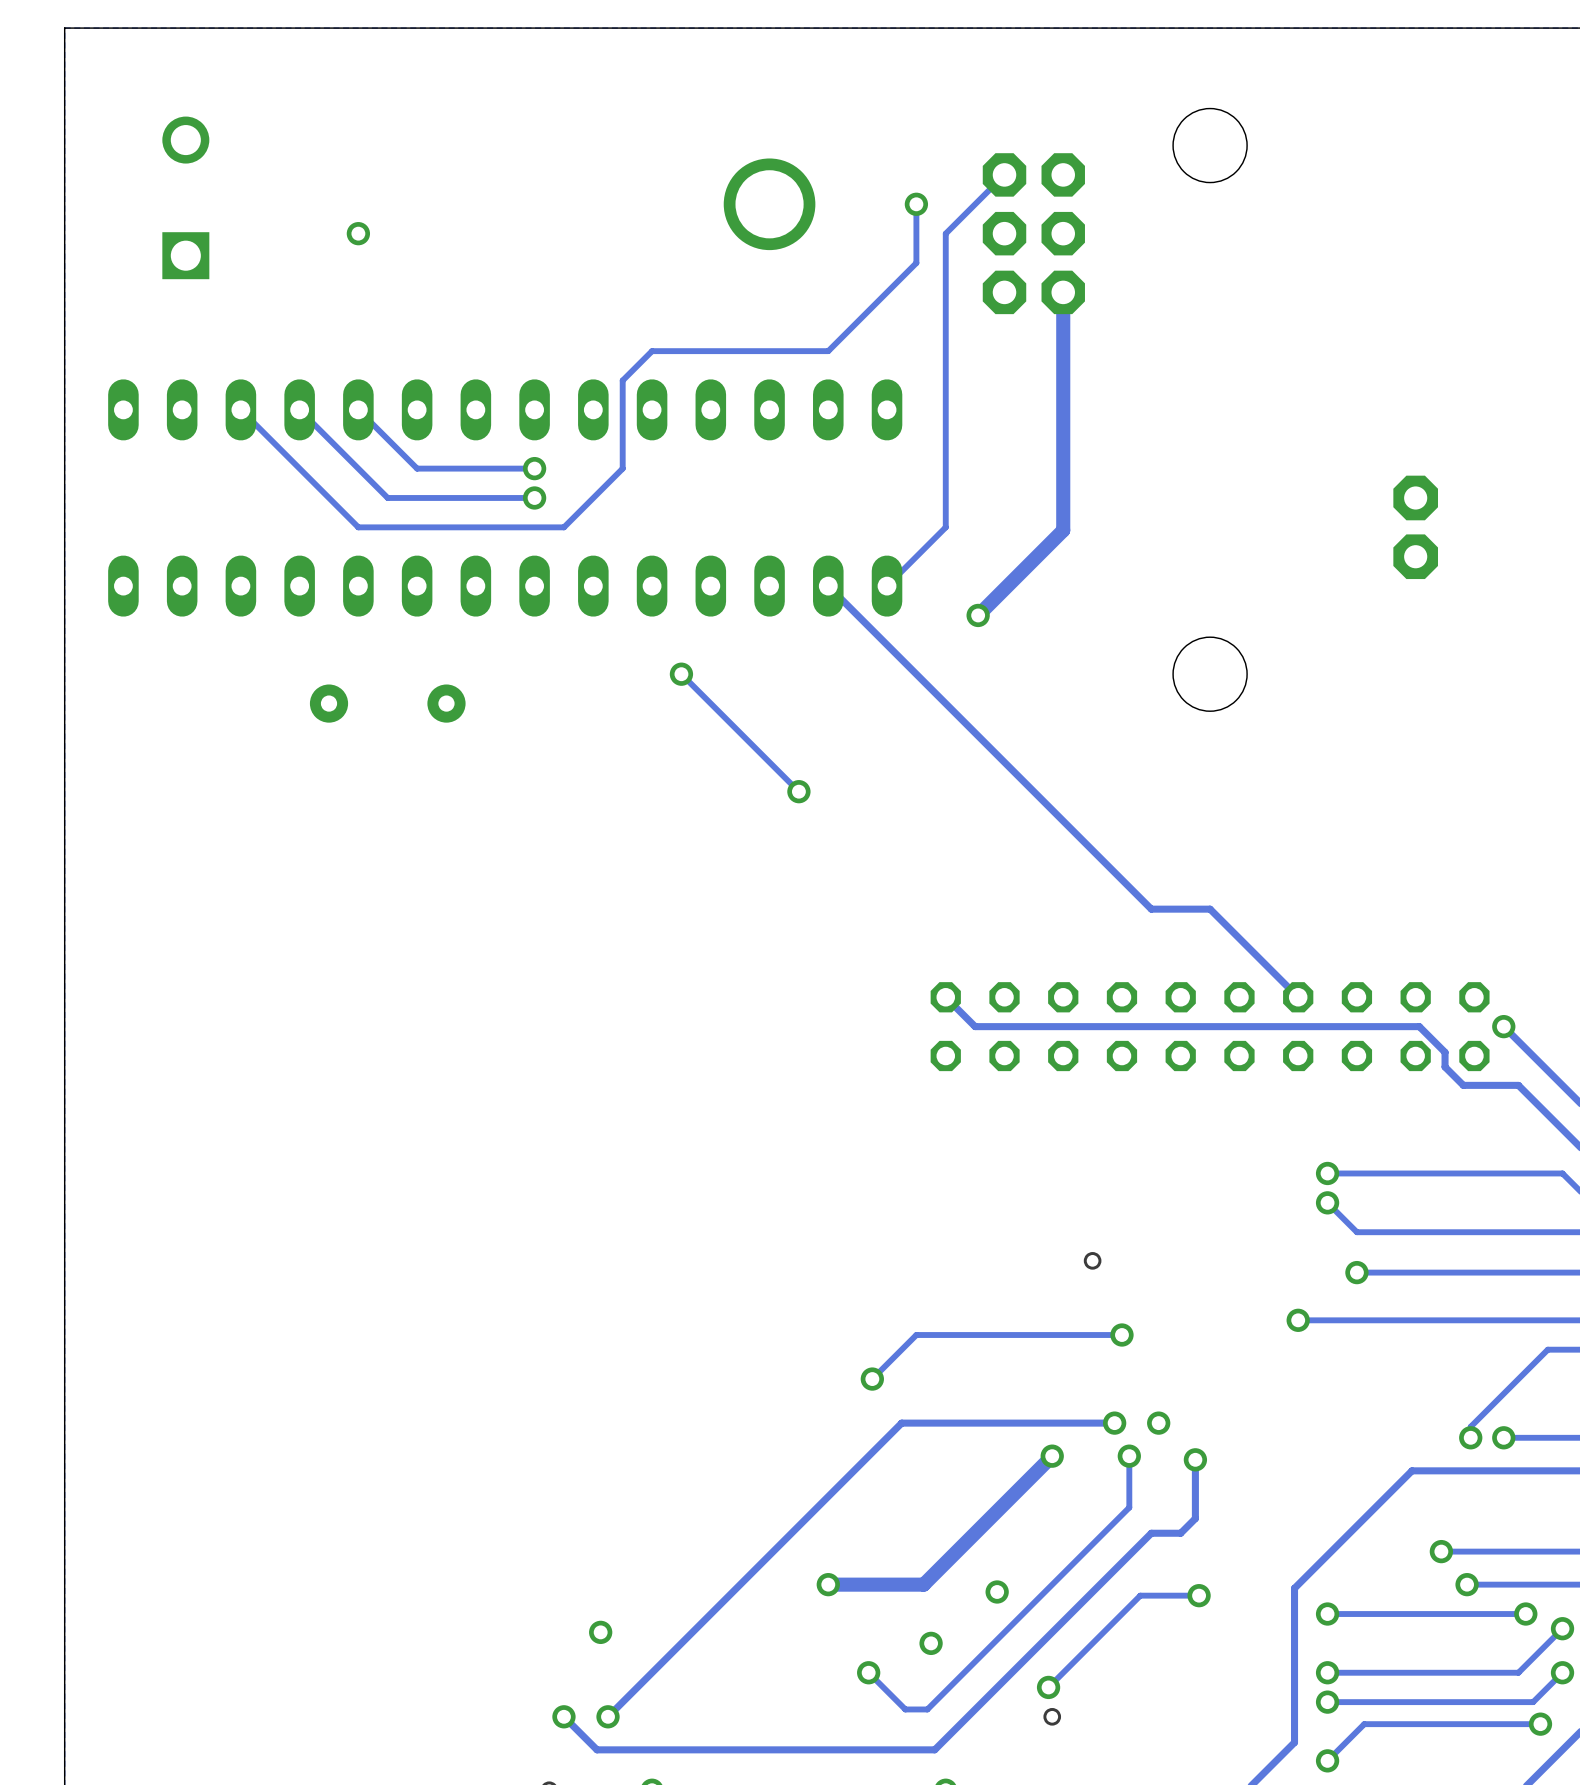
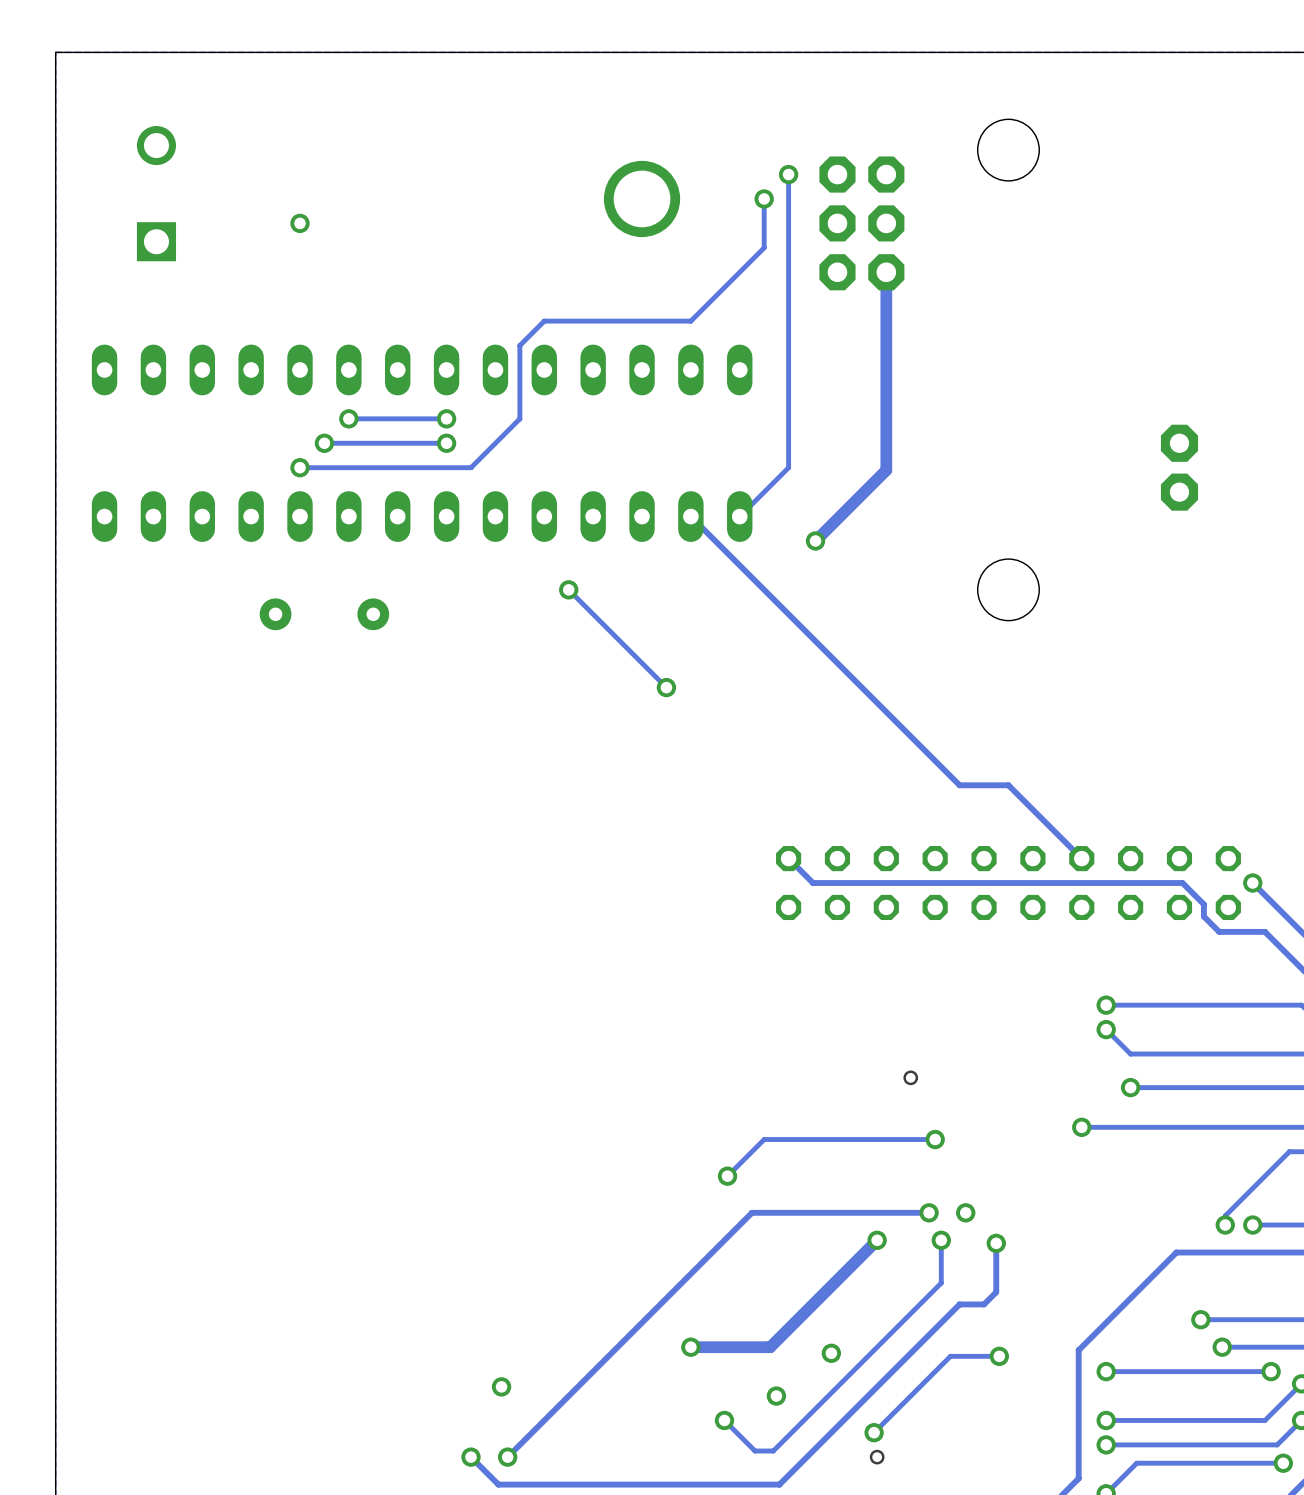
via: none -> (788, 174)
track: (1004, 174) (945, 233) -> (788, 174) (788, 223)
track: (240, 409) (358, 527) -> none
track: (299, 409) (387, 497) -> none
track: (358, 409) (417, 468) -> none
via: none -> (348, 418)
via: none -> (324, 443)
via: none -> (300, 467)

